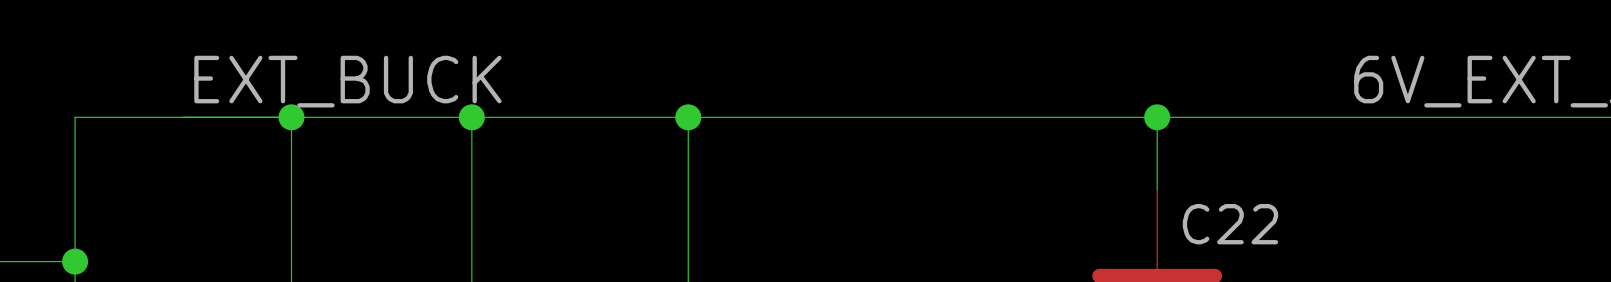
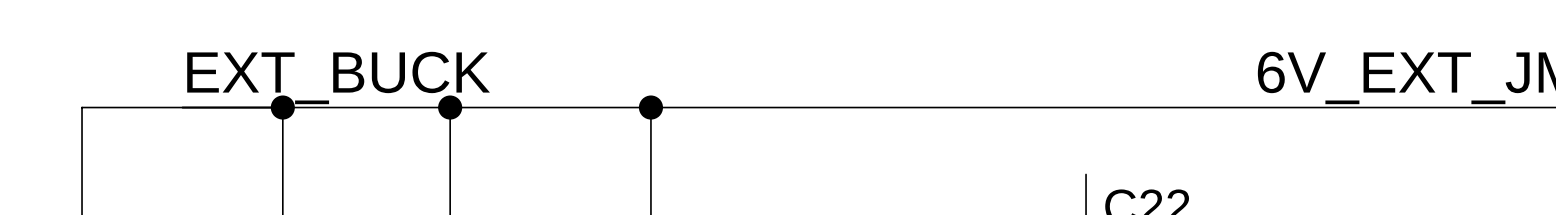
wire: (1157, 117) (1157, 189) -> none
junction: (1157, 117) -> none

